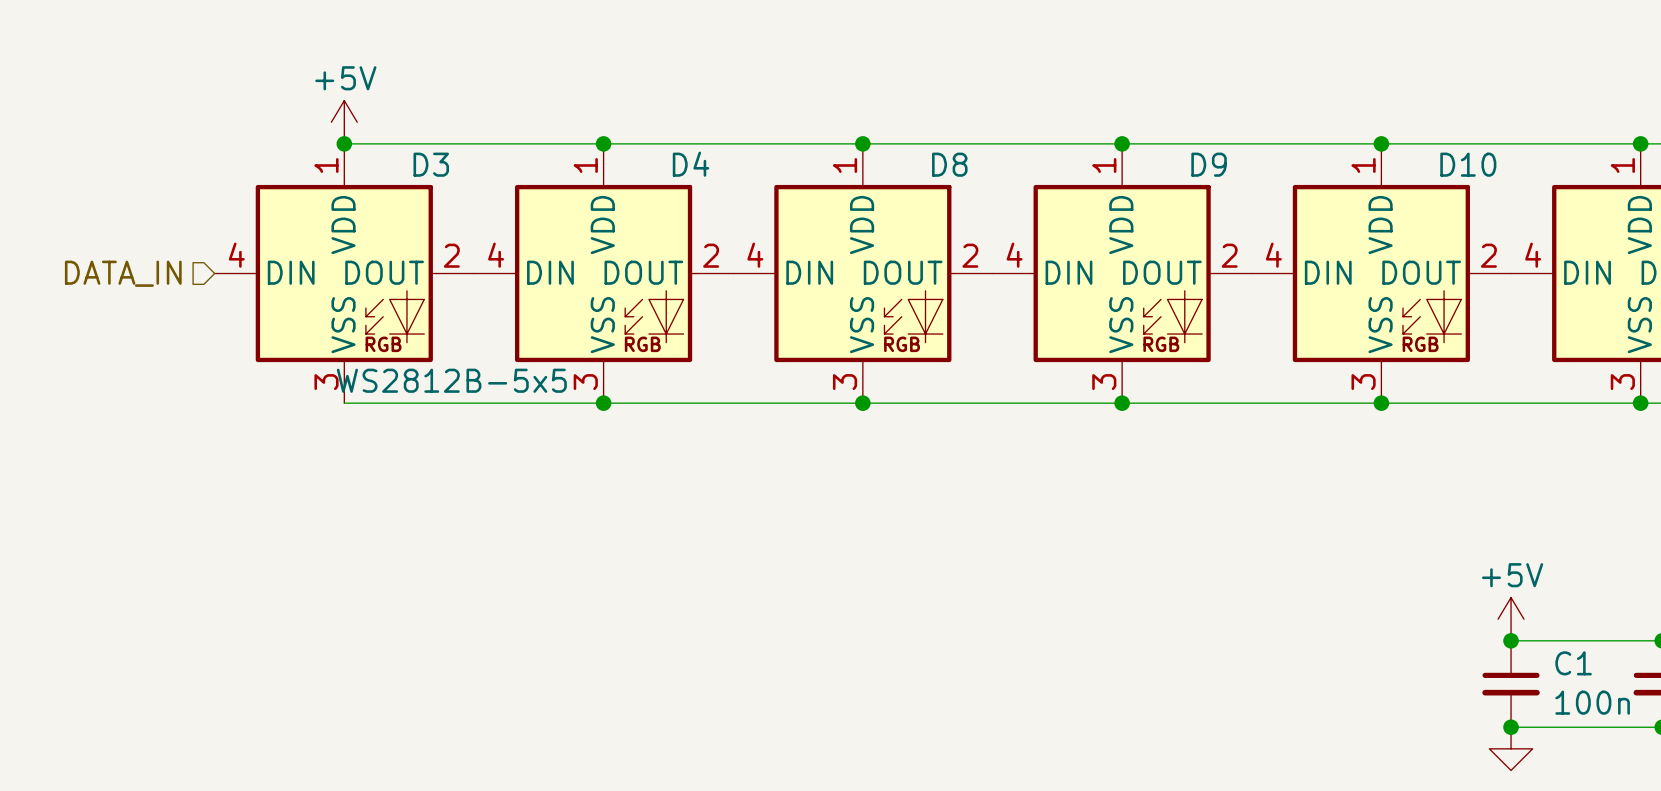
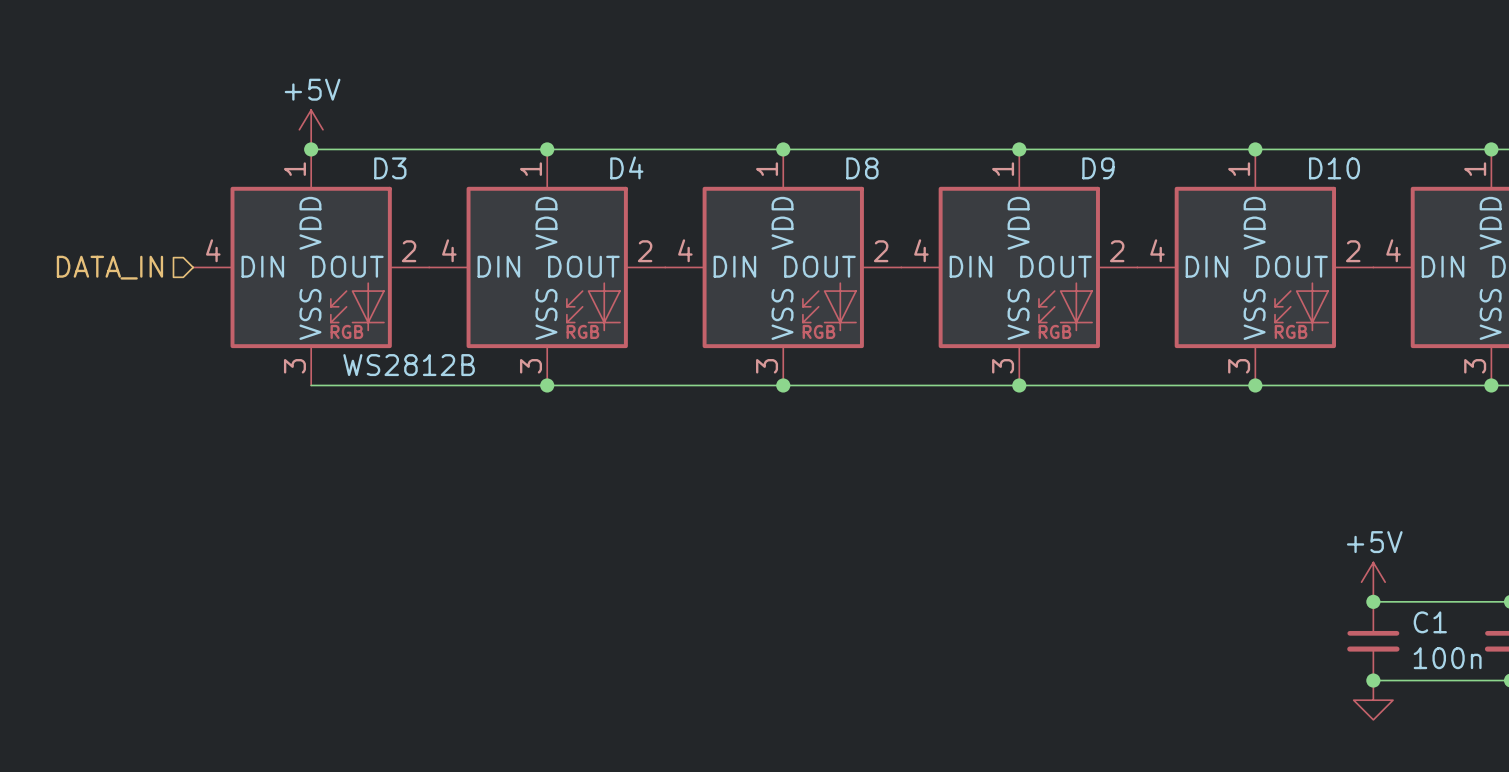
D3 value: WS2812B-5x5 (451, 380) -> WS2812B (409, 365)

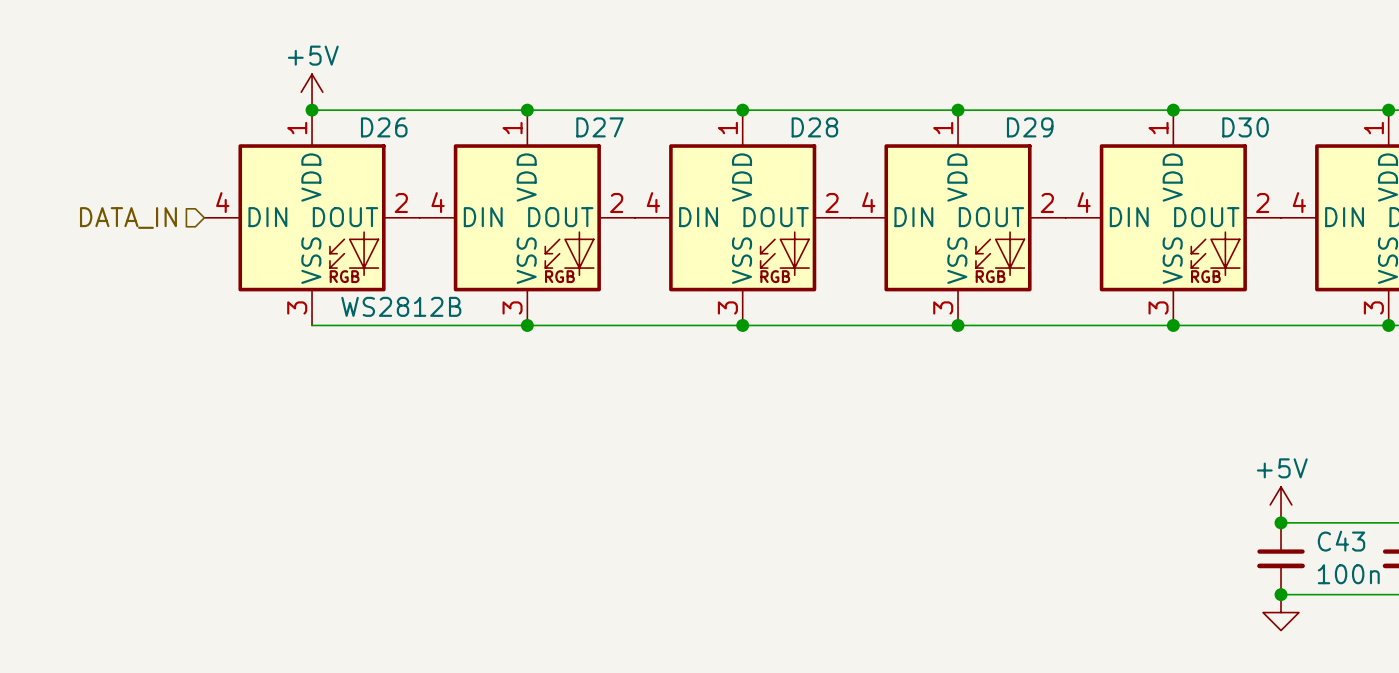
D4 name: D4 (626, 167) -> D27 (599, 127)
D3 name: D3 (390, 168) -> D26 (384, 127)
D8 name: D8 (862, 168) -> D28 (814, 127)
D9 name: D9 (1098, 168) -> D29 (1030, 127)
D10 name: D10 (1334, 168) -> D30 (1245, 127)
C1 name: C1 (1430, 622) -> C43 (1341, 541)

